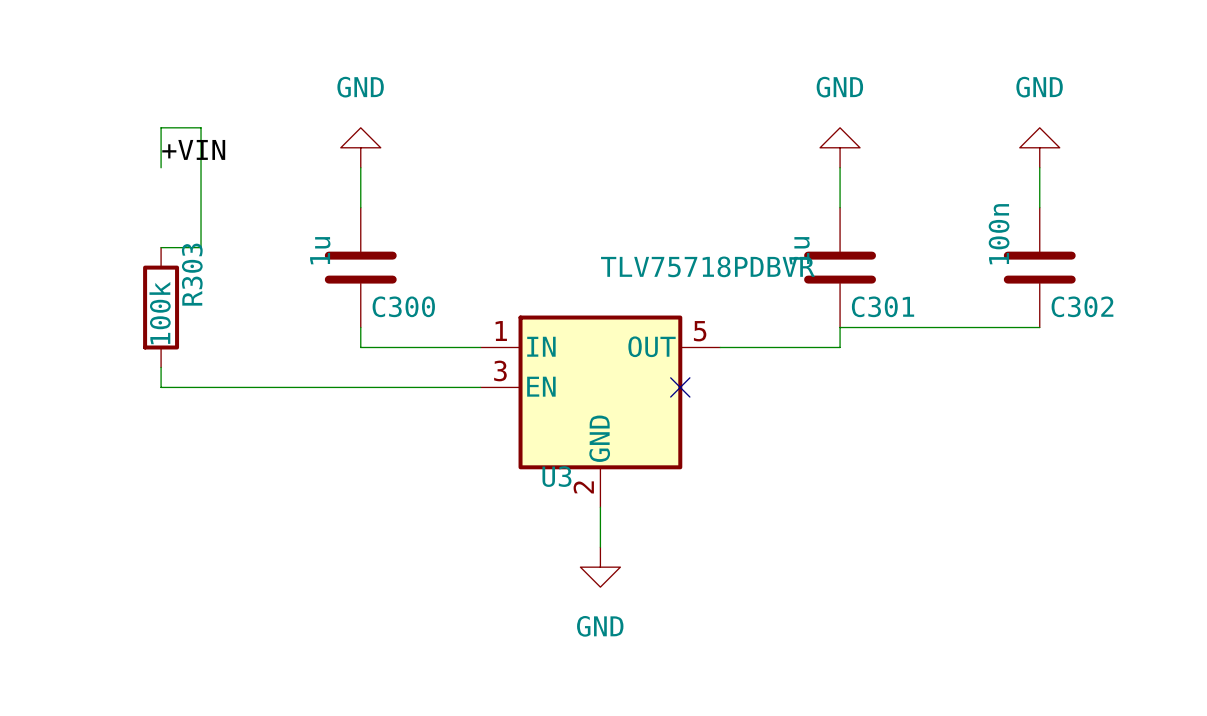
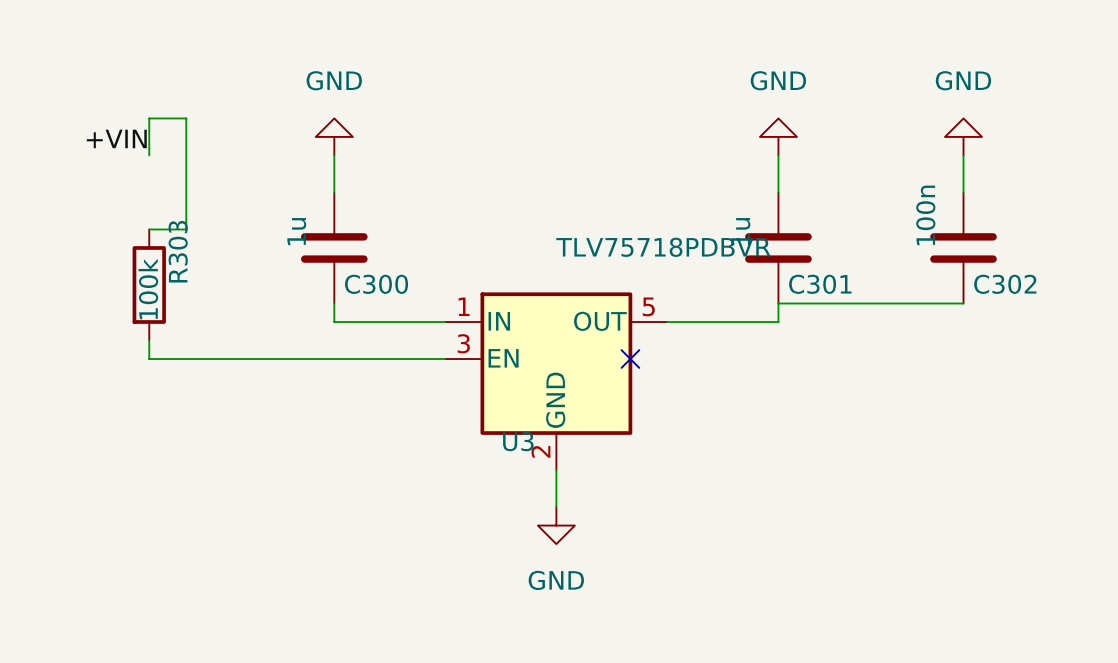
label position: +VIN (193, 149) -> +VIN (116, 138)

